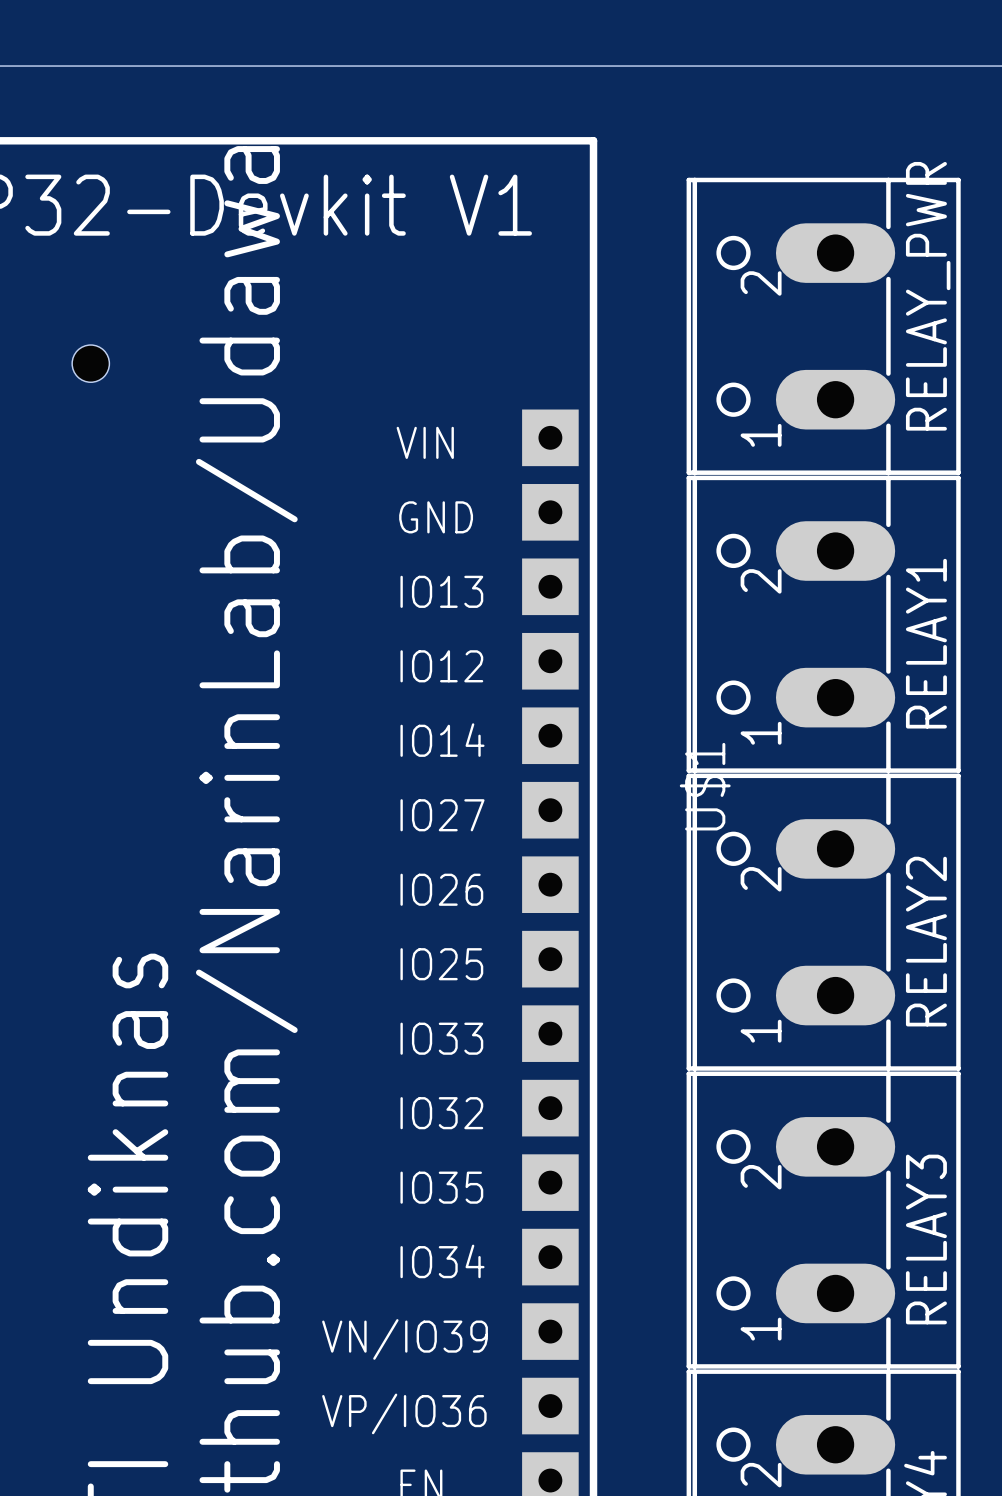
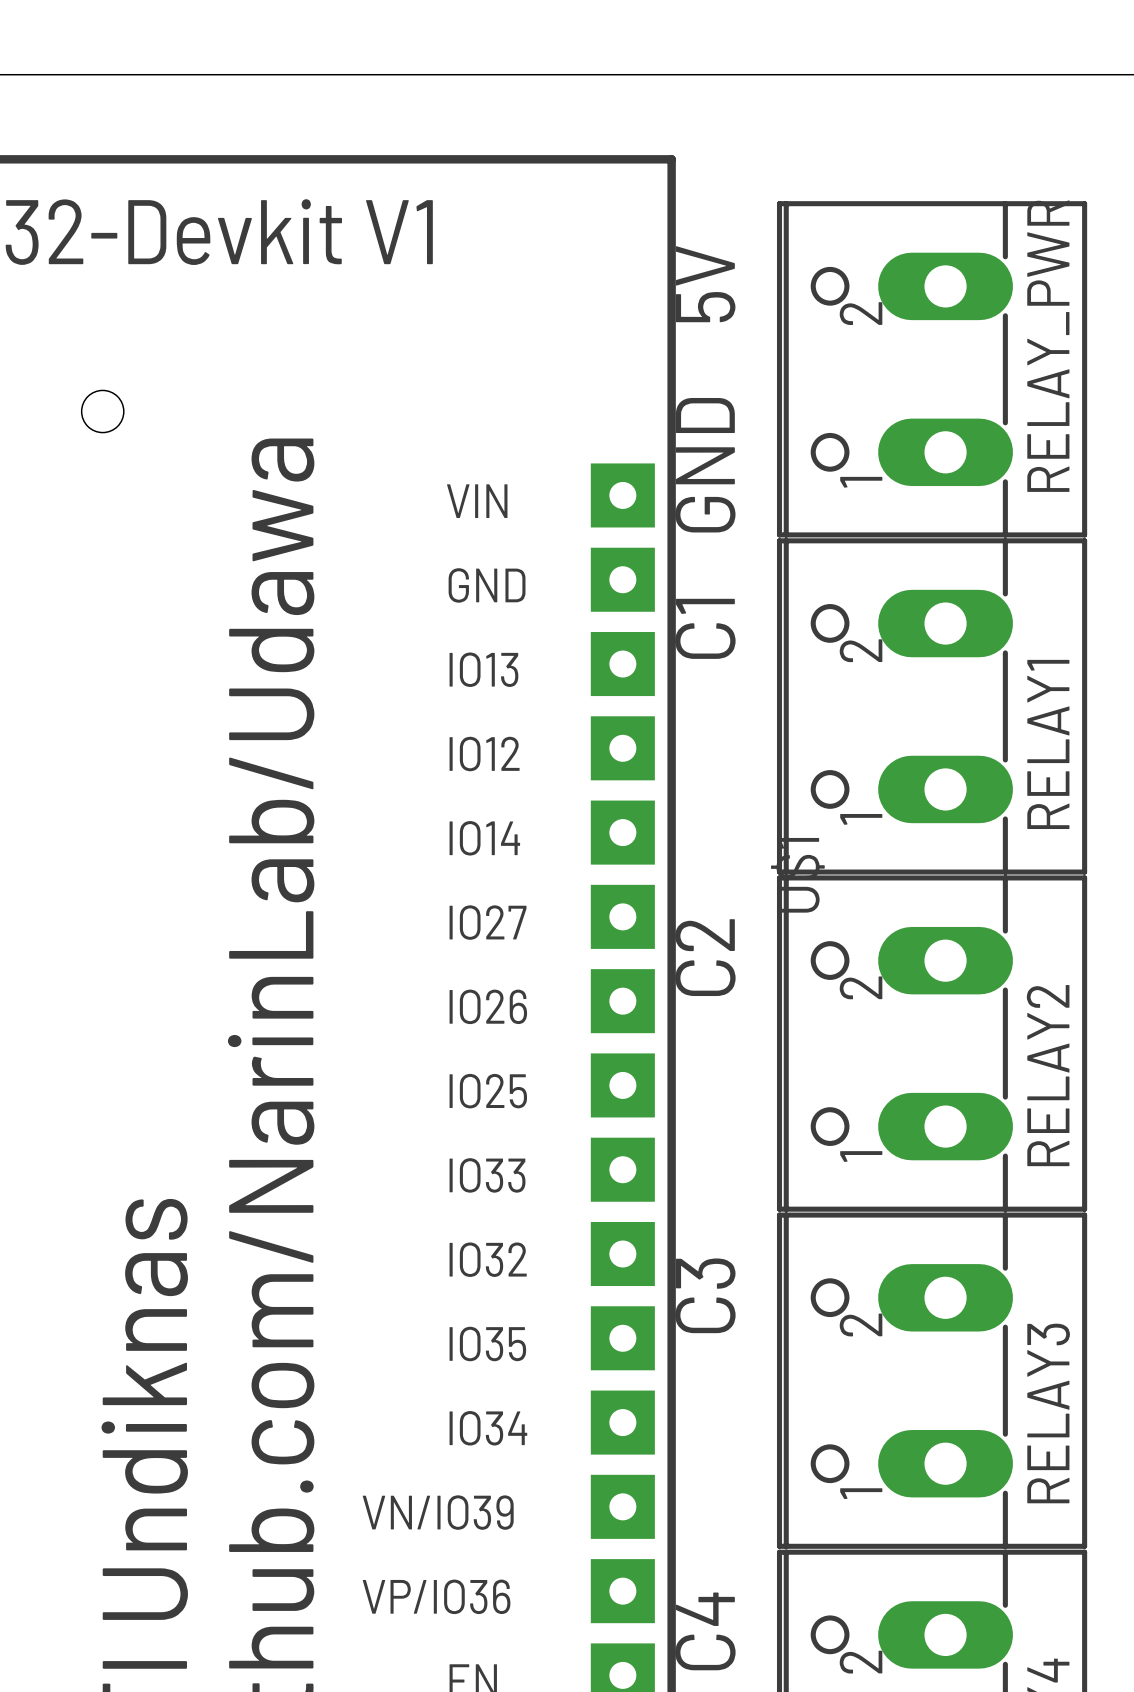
text: none -> 5V (705, 284)
text: none -> GND (705, 465)
text: none -> C1 (705, 628)
text: none -> C2 (705, 957)
text: none -> C3 (705, 1295)
text: none -> C4 (705, 1631)

